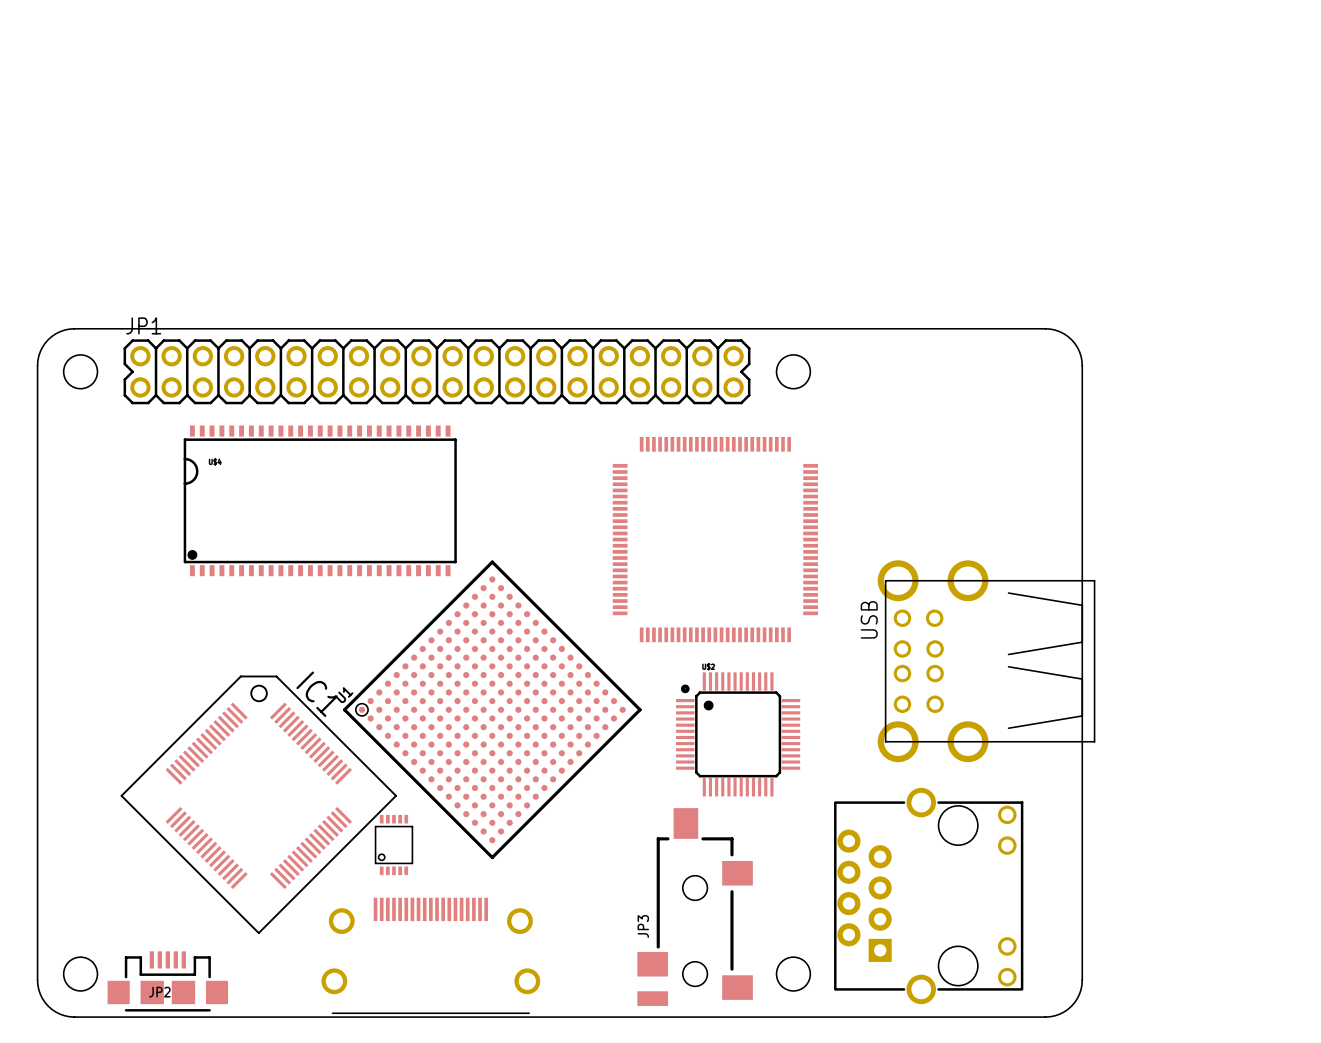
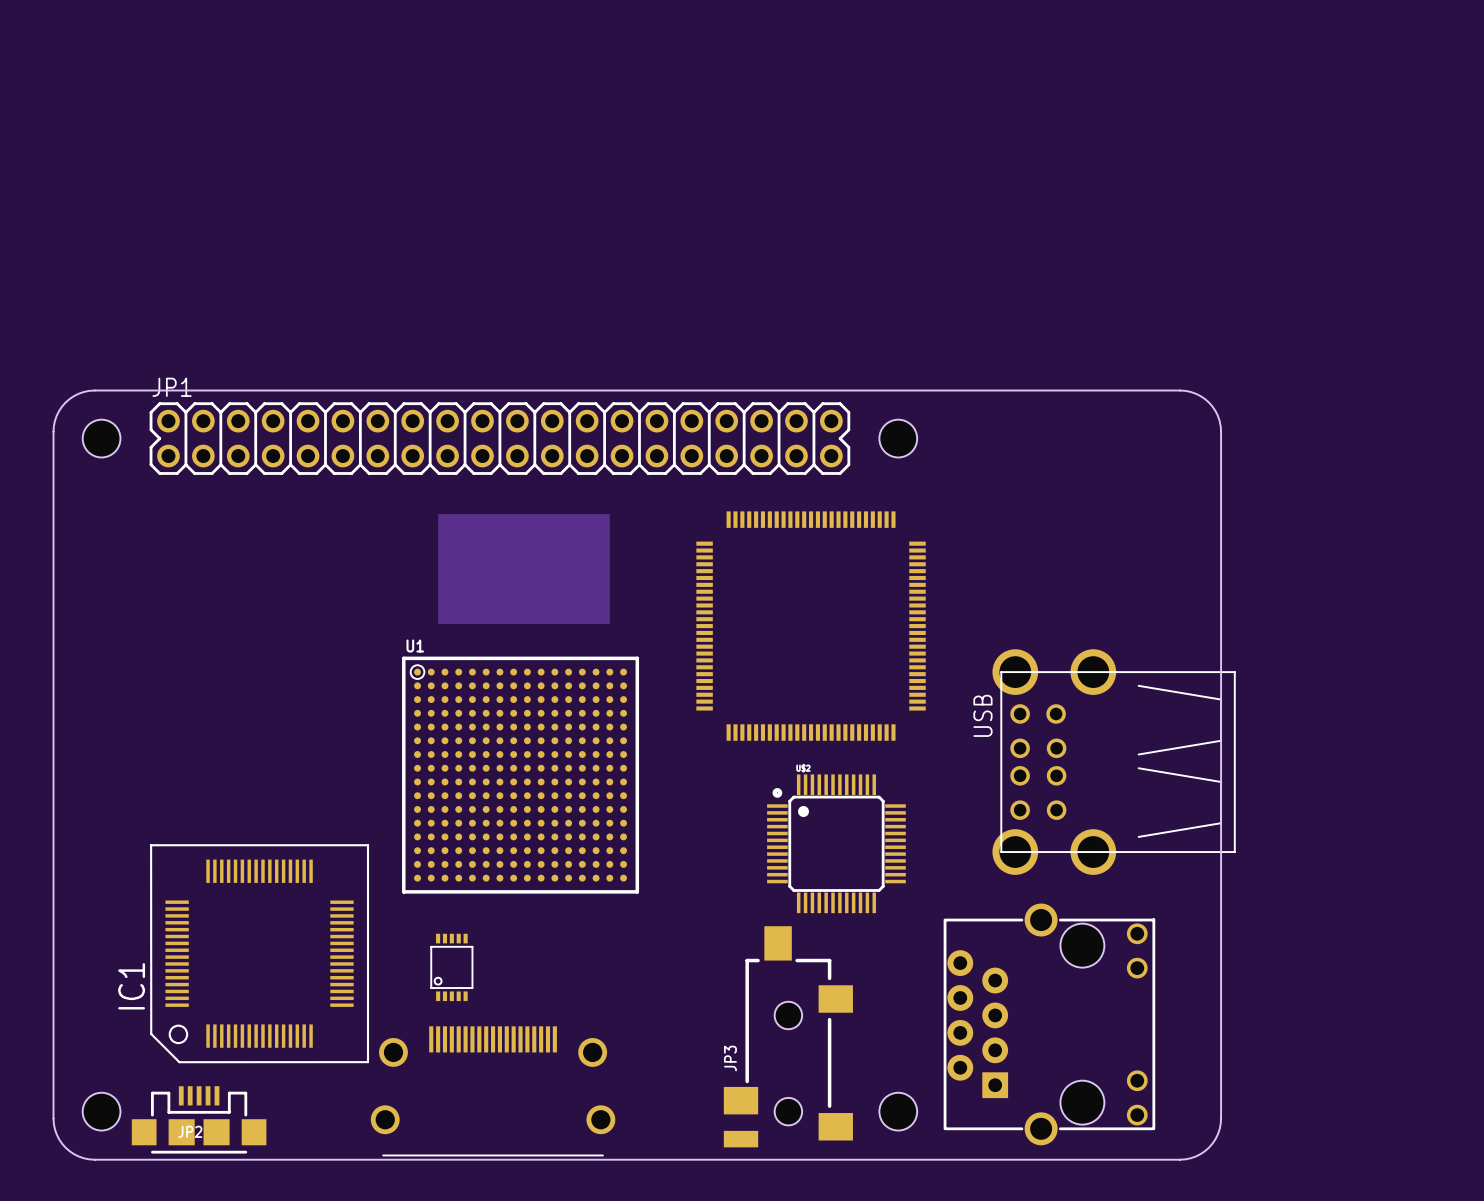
drawing: none -> [438, 514, 610, 625]
part: (320, 500) -> none
U1 rotation: 0° (492, 709) -> 45° clockwise (520, 775)
IC1 rotation: 0° (258, 804) -> 135° counterclockwise (259, 953)

